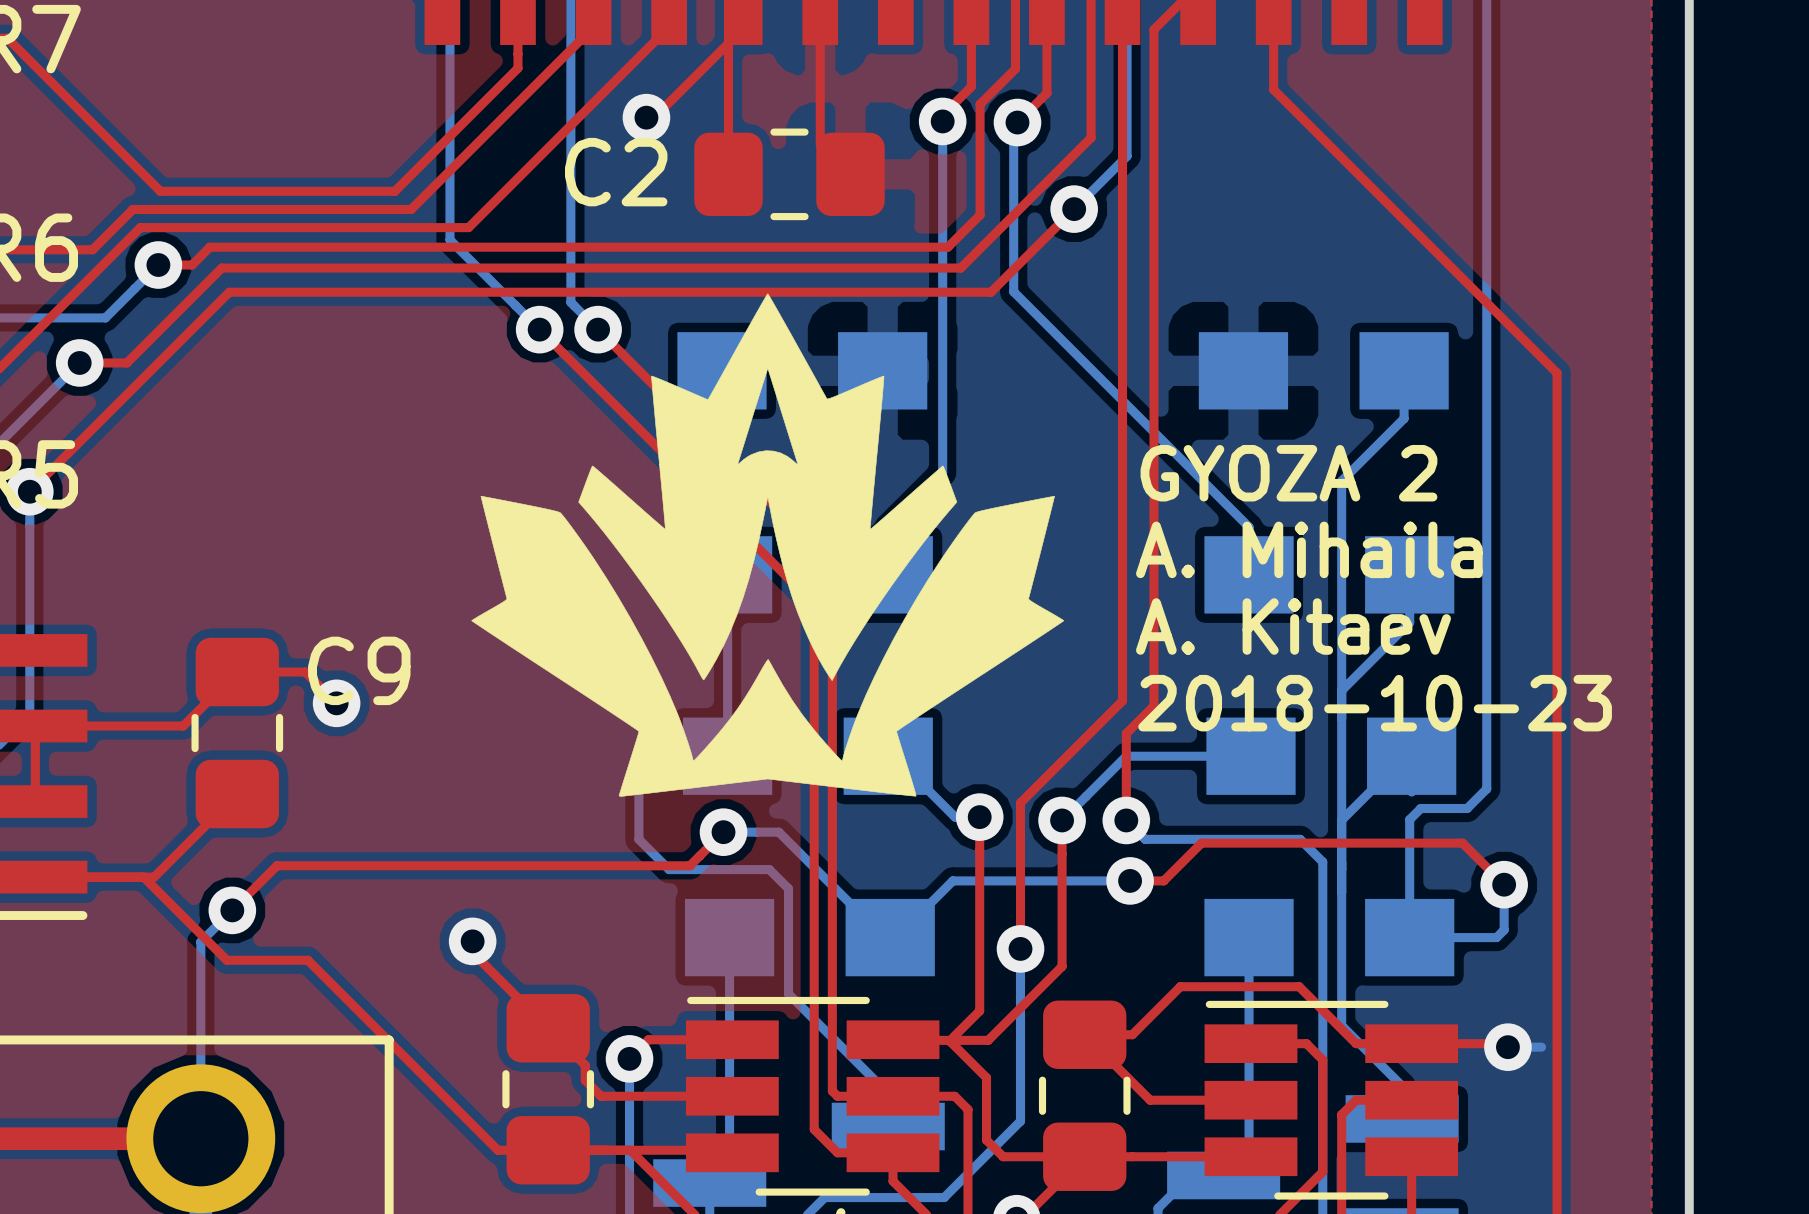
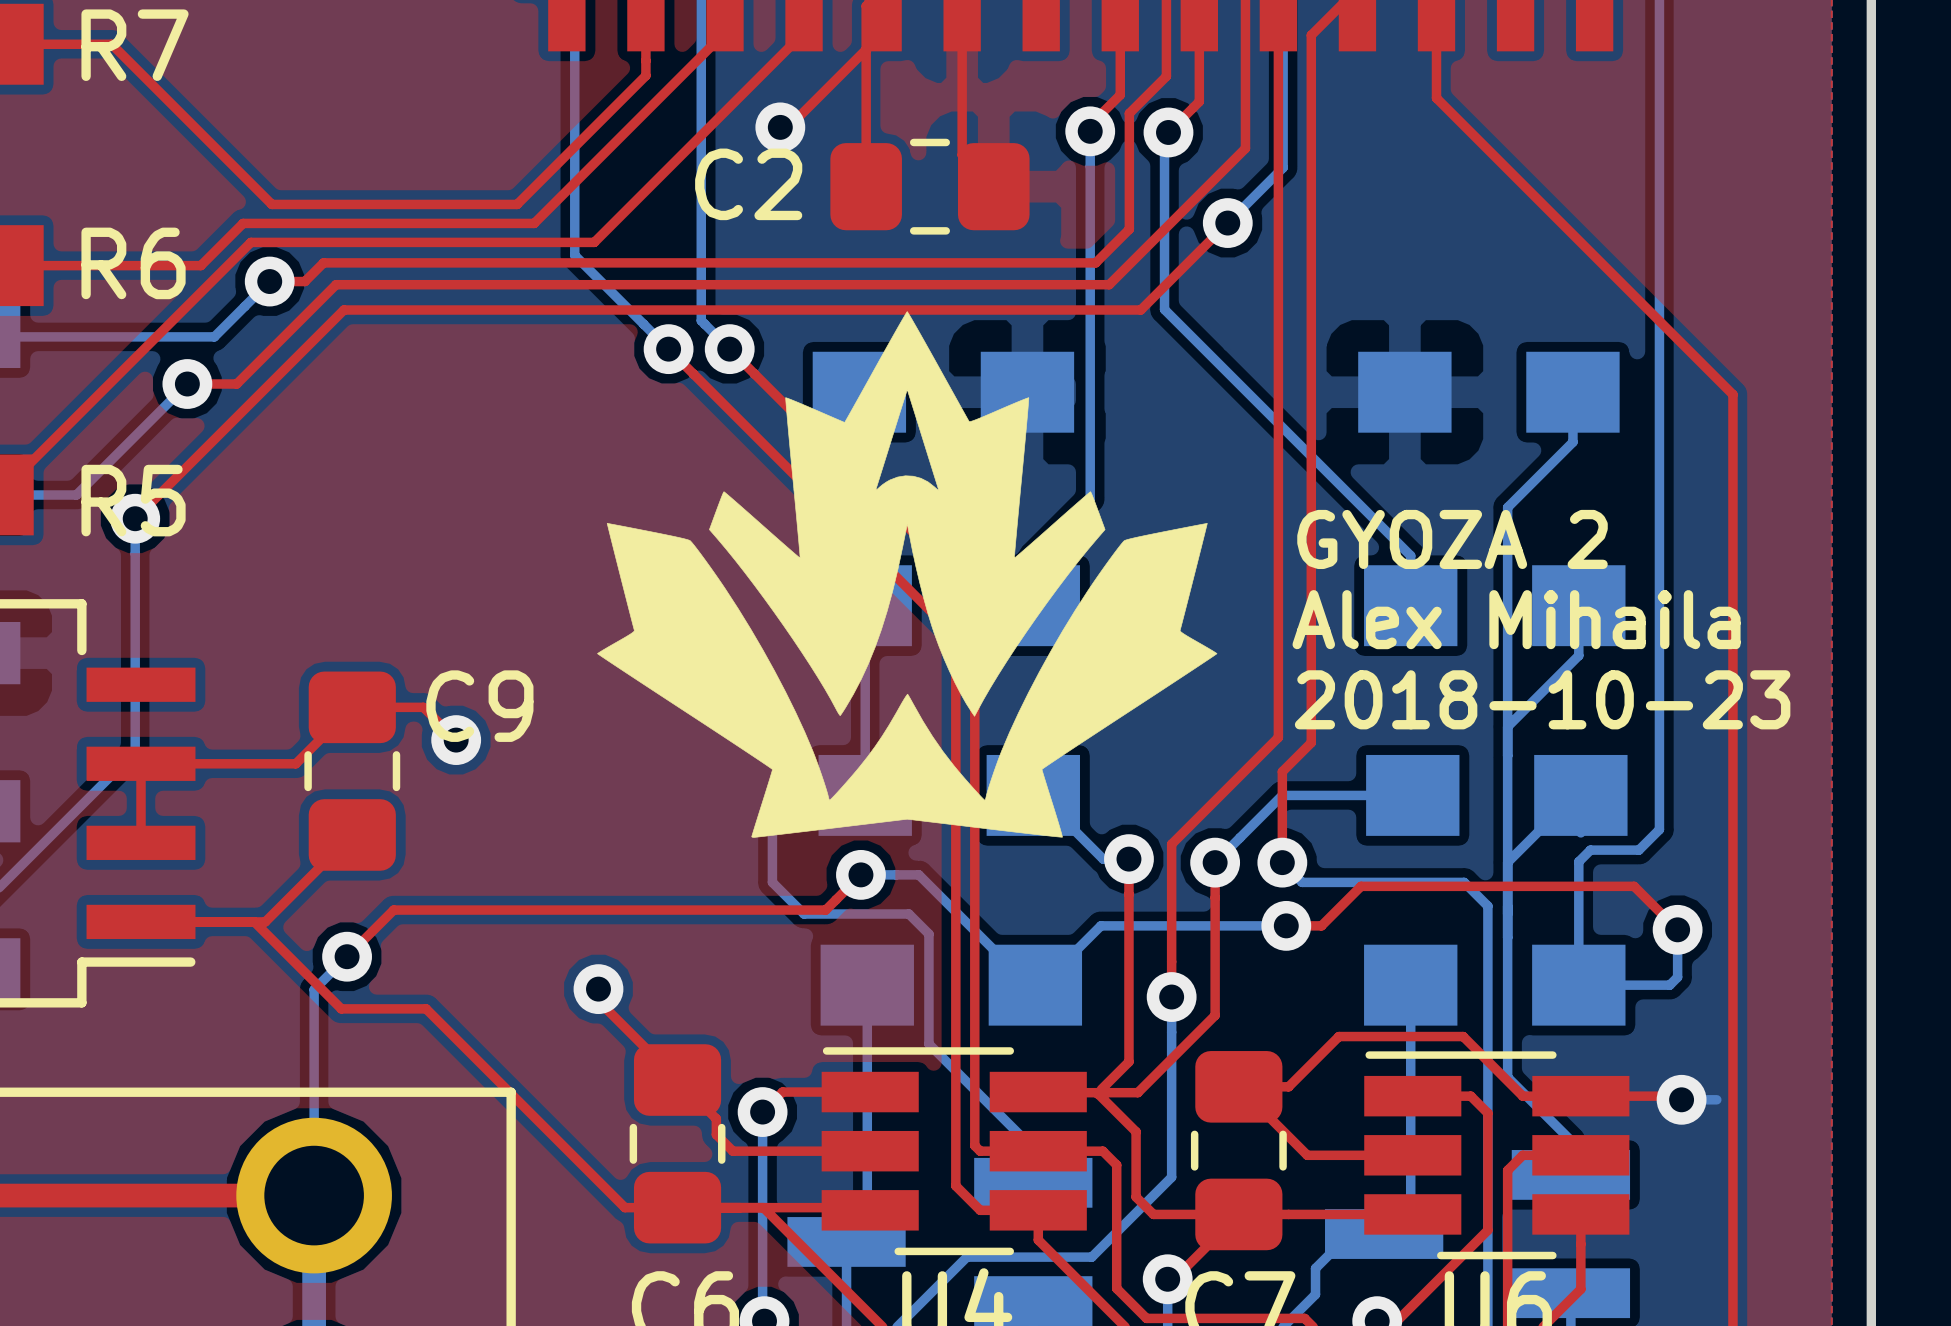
text position: GYOZA 2 (1288, 473) -> GYOZA 2 (1452, 539)
text: A. Mihaila (1309, 549) -> Alex Mihaila (1516, 619)
text: A. Kitaev (1293, 626) -> none
text position: 2018-10-23 (1375, 703) -> 2018-10-23 (1542, 699)

